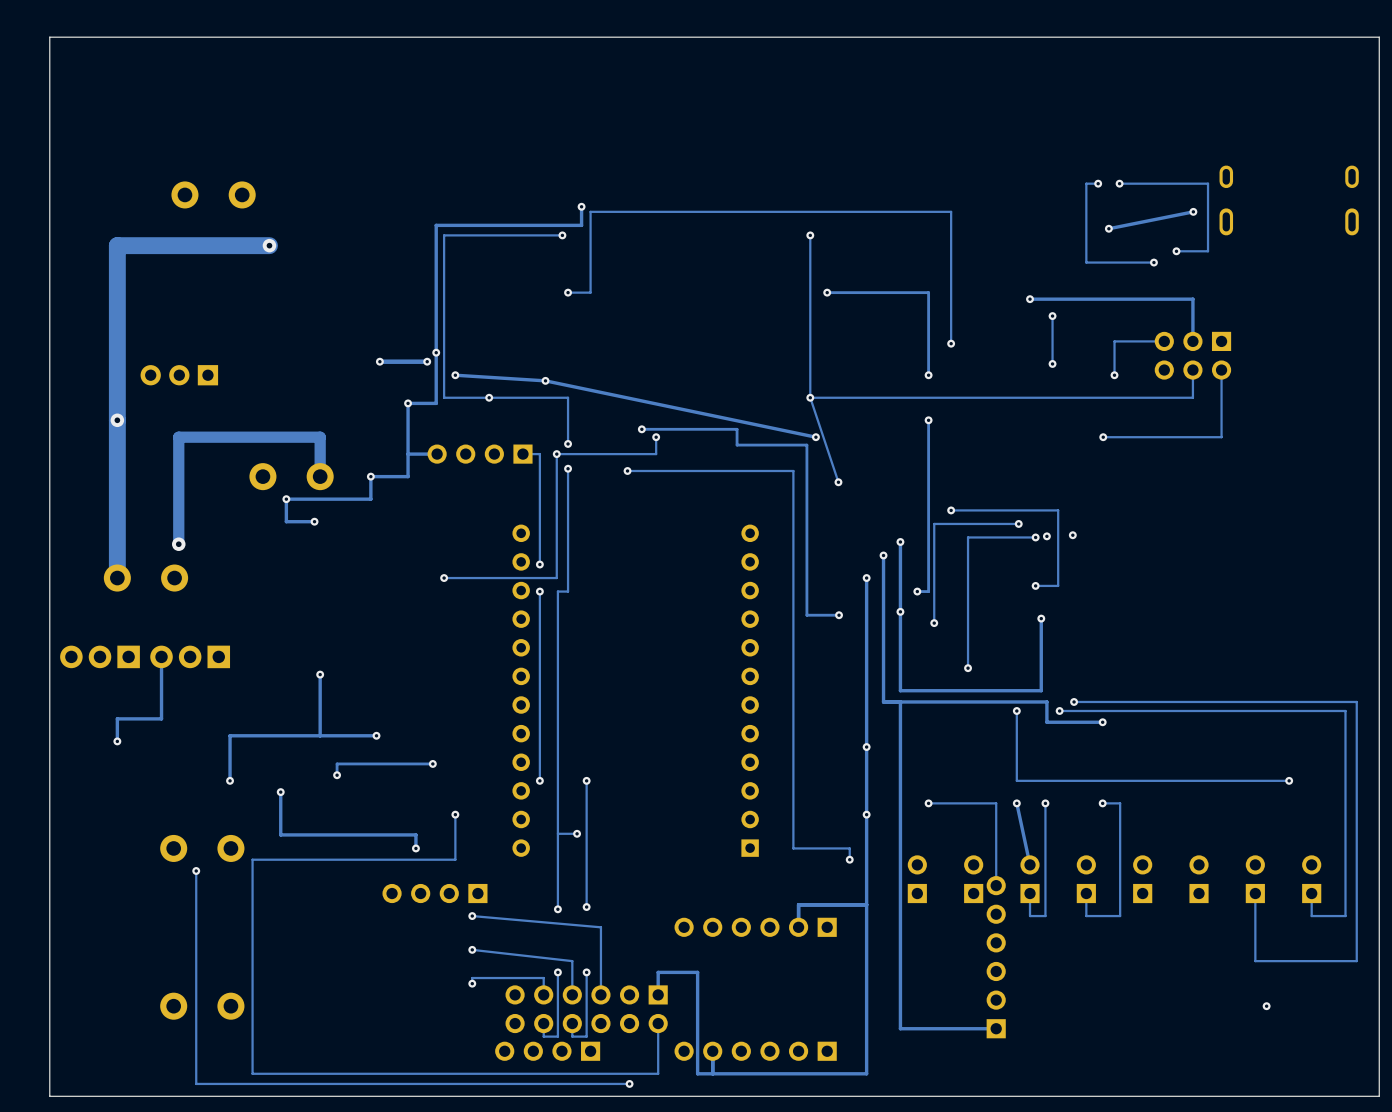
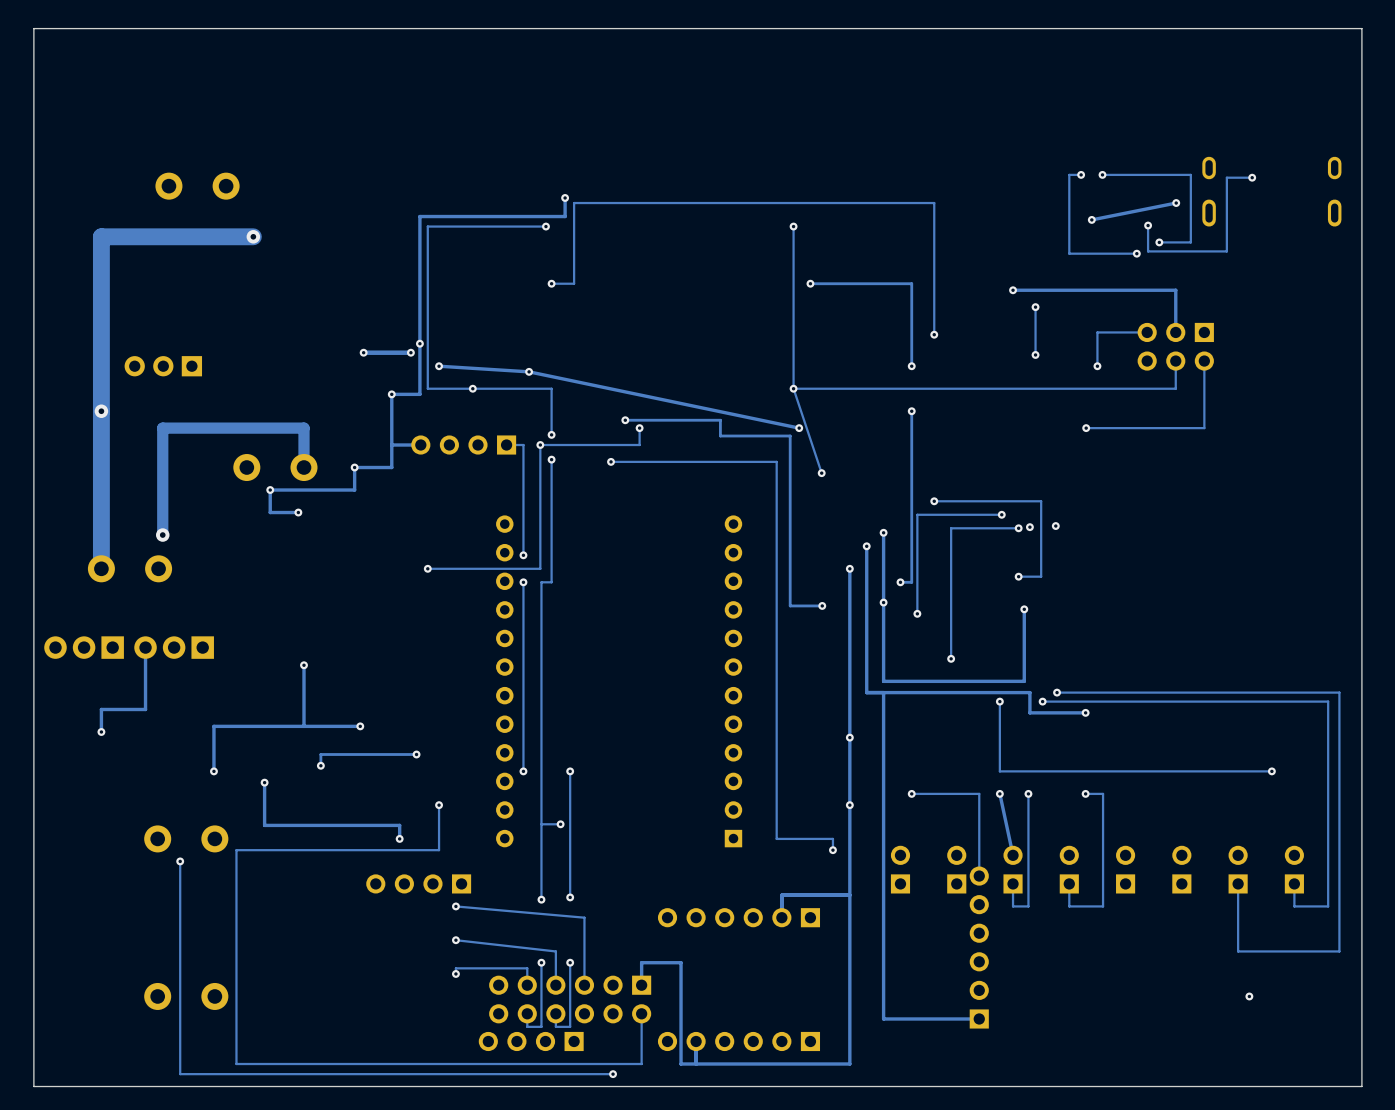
track: none -> (1252, 177) (1226, 177) (1226, 251) (1148, 251) (1148, 225)
via: none -> (1252, 177)
via: none -> (1148, 225)

